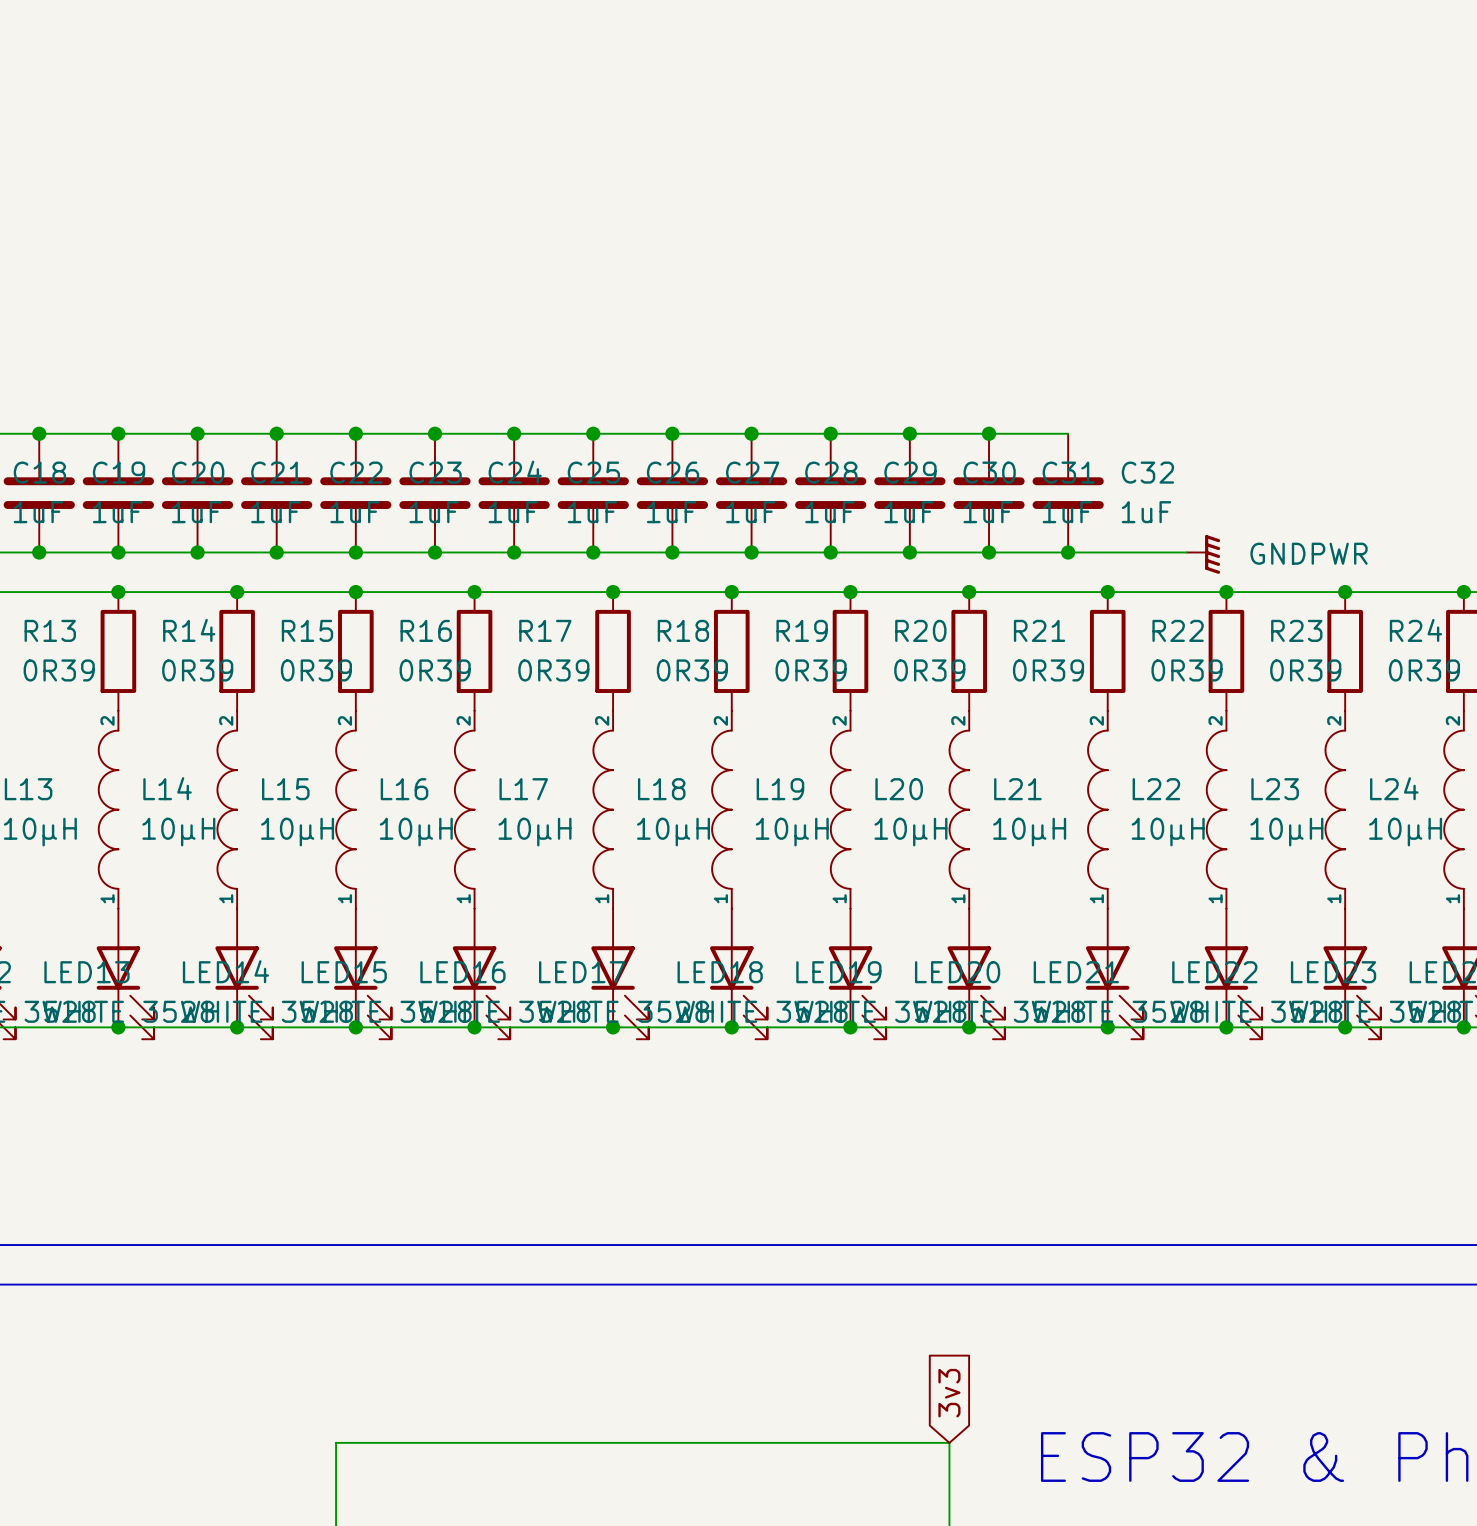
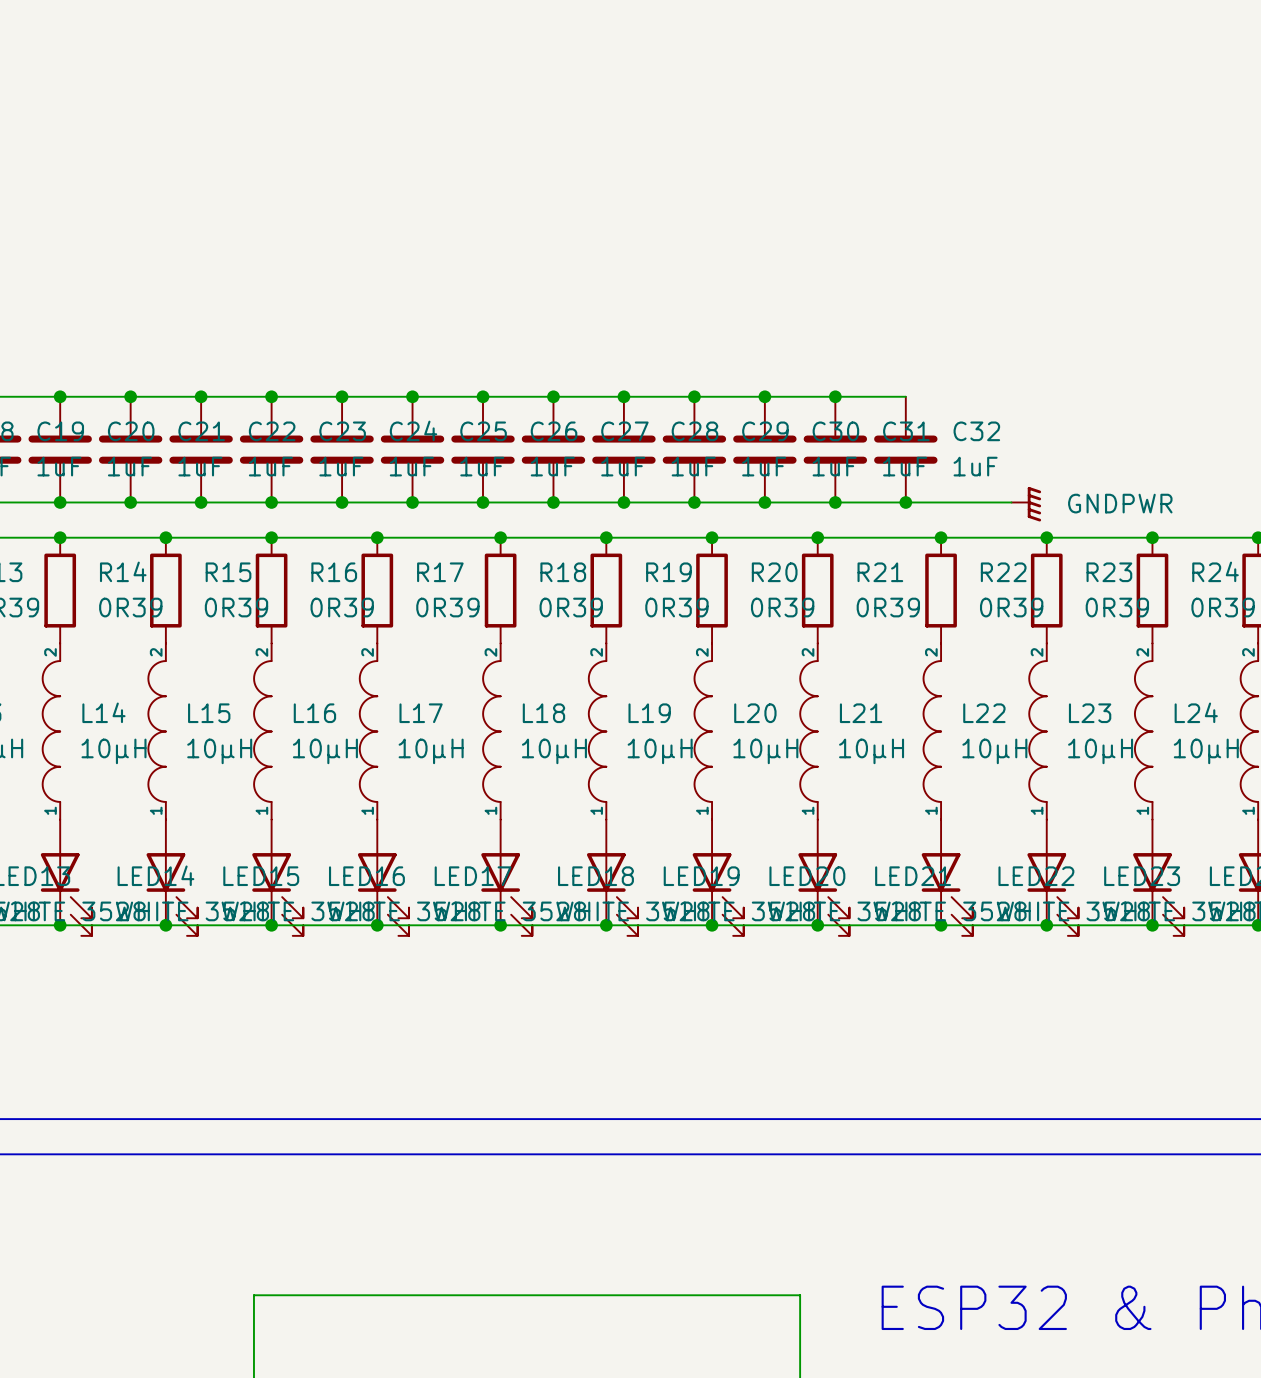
global label: 3v3 (949, 1393) -> none

